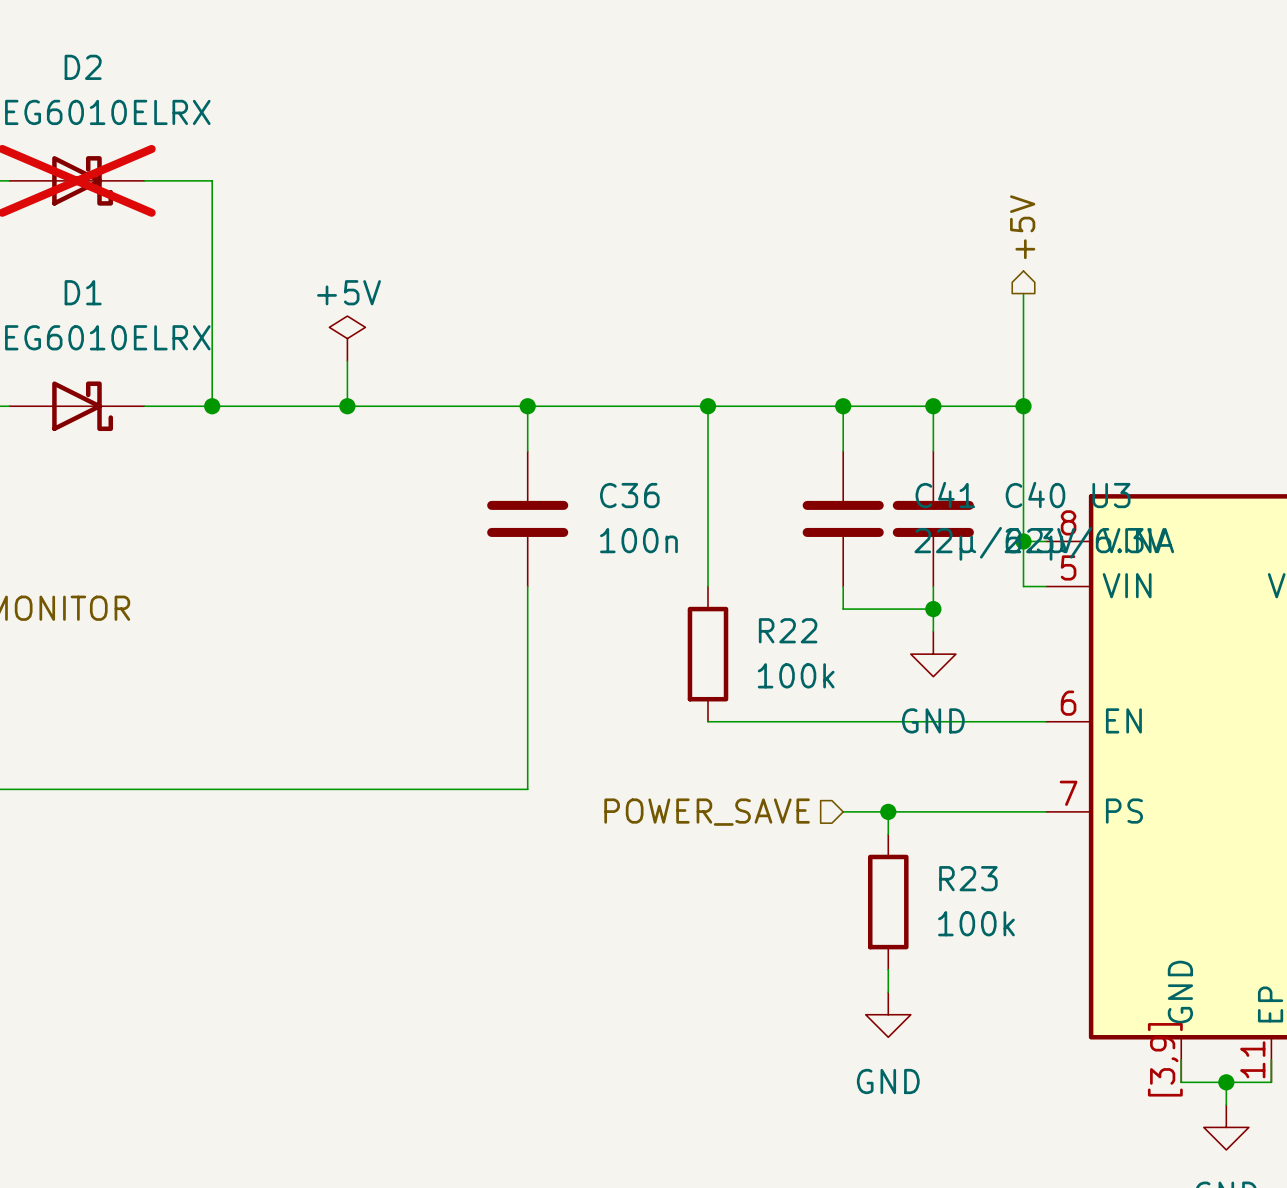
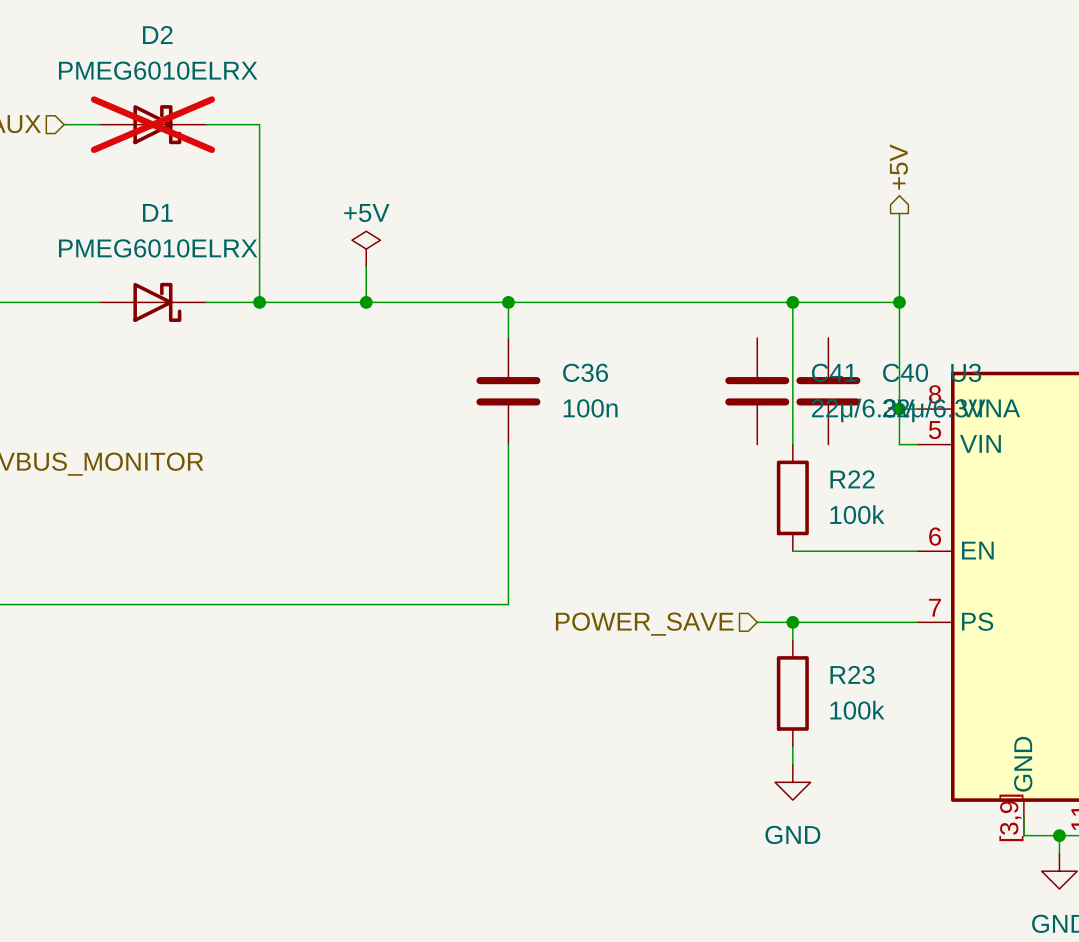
wire: (707, 406) (707, 586) -> (792, 302) (792, 444)
junction: (707, 406) -> none
wire: (843, 406) (843, 451) -> none
junction: (843, 406) -> none
junction: none -> (792, 302)
wire: (933, 406) (933, 451) -> none
junction: (933, 406) -> none
wire: (843, 586) (843, 609) (933, 609) -> none
wire: (933, 586) (933, 631) -> none
junction: (933, 609) -> none
R22 position: (707, 654) -> (792, 497)
power symbol: GND (933, 654) -> none
wire: (707, 721) (888, 721) -> none

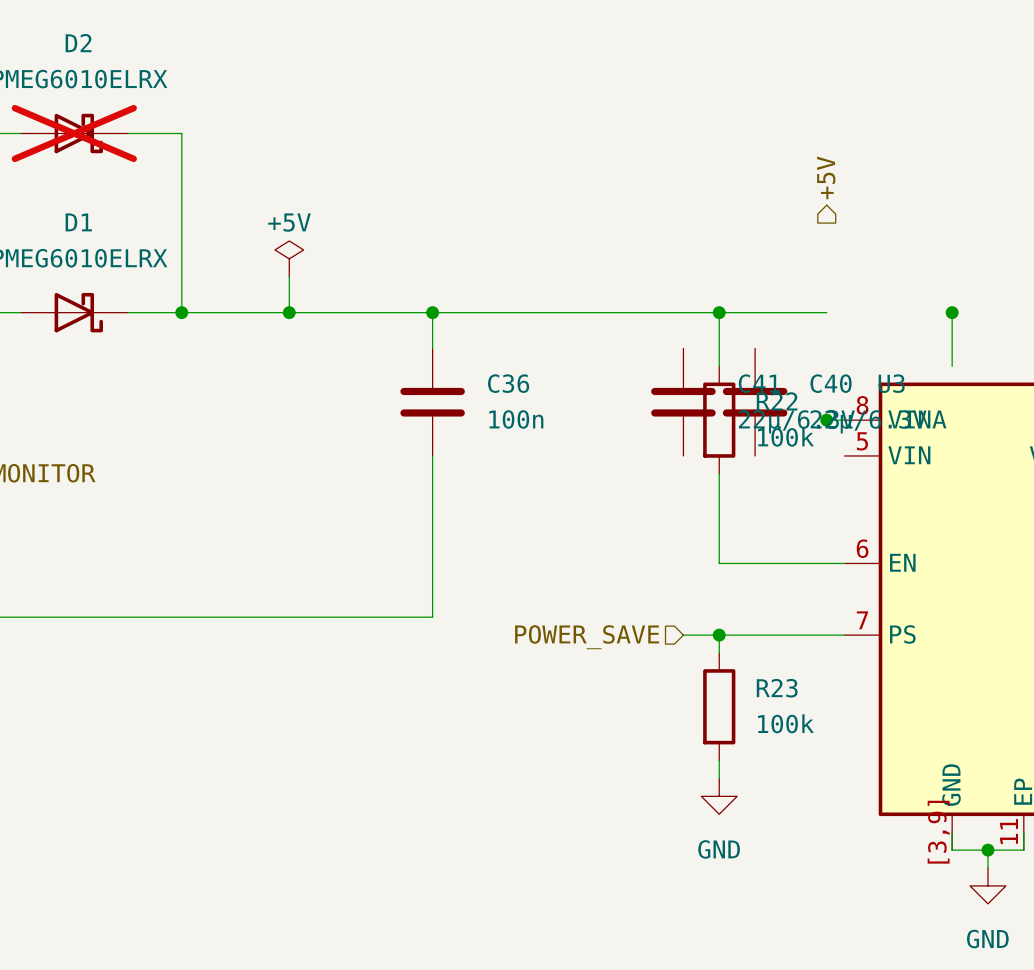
wire: (899, 213) (899, 444) (917, 444) -> none
junction: (899, 302) -> none
wire: none -> (952, 312) (952, 366)
junction: none -> (952, 312)
wire: (792, 355) (792, 444) -> (719, 473) (719, 563)
R22 position: (792, 497) -> (719, 420)

